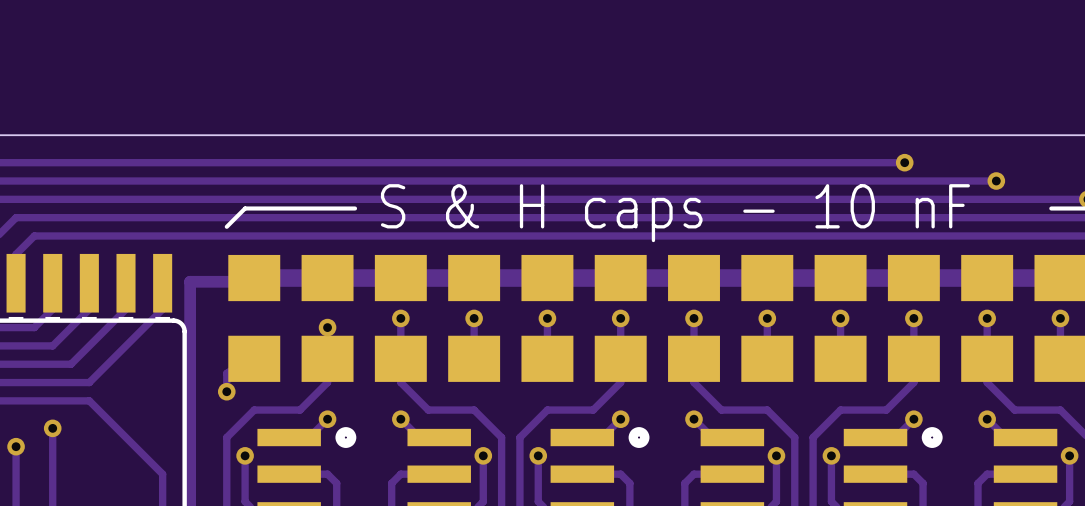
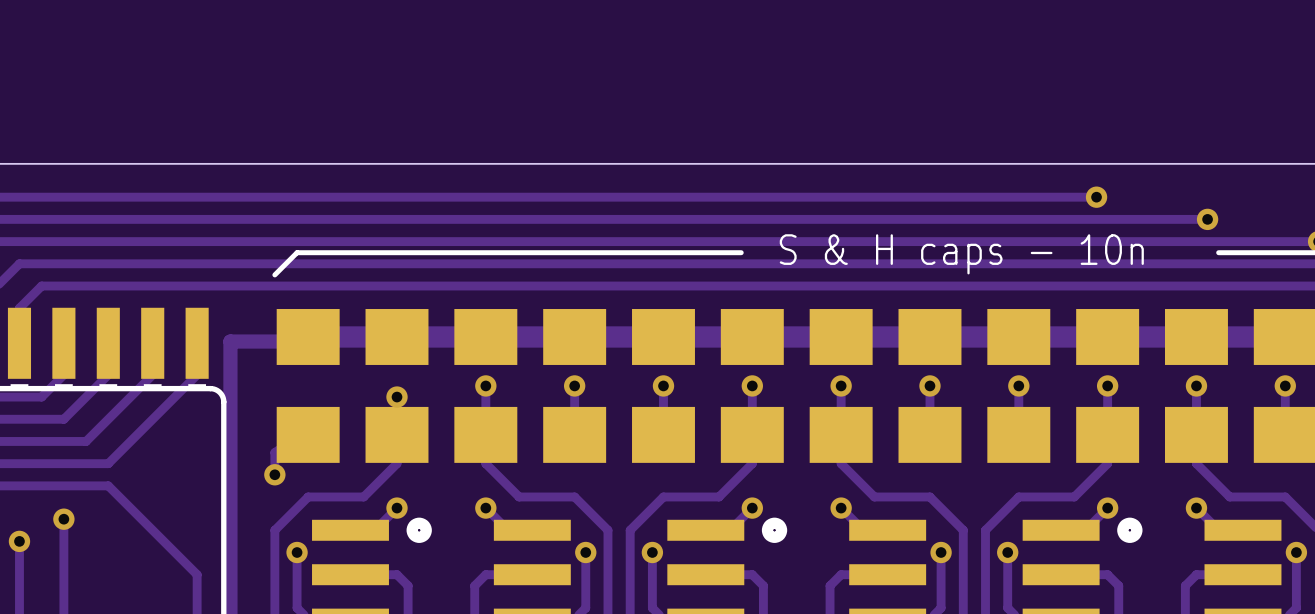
line: none -> (430, 252) (741, 252)
line: none -> (1218, 252) (1274, 252)
text: S & H caps - 10 nF (675, 213) -> S & H caps - 10n (961, 254)

